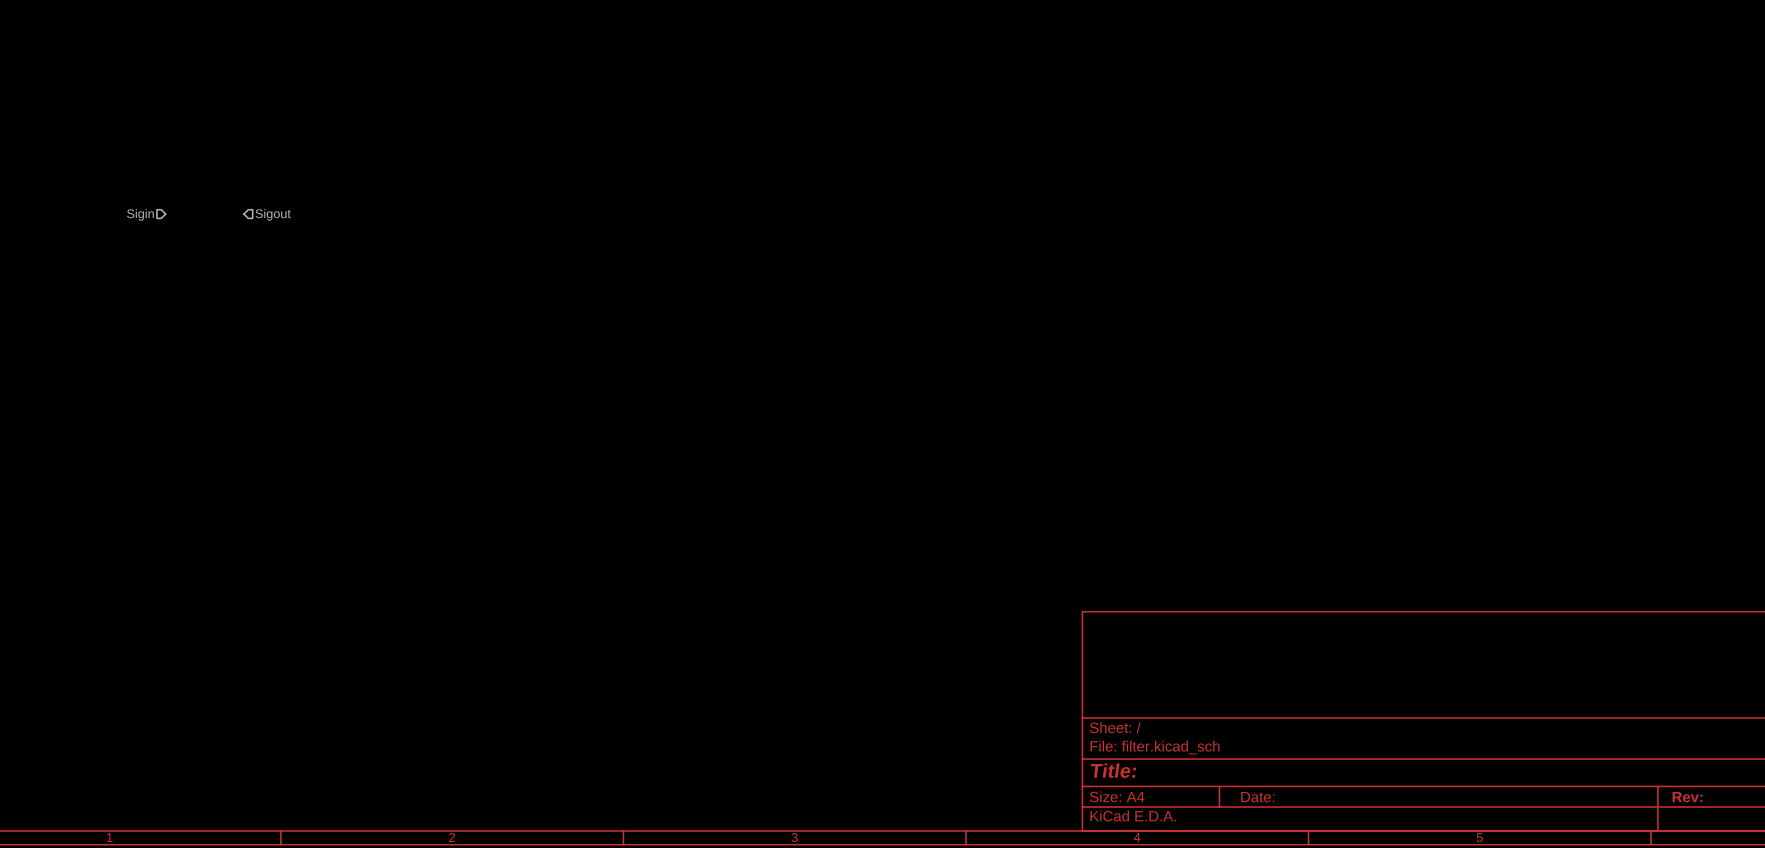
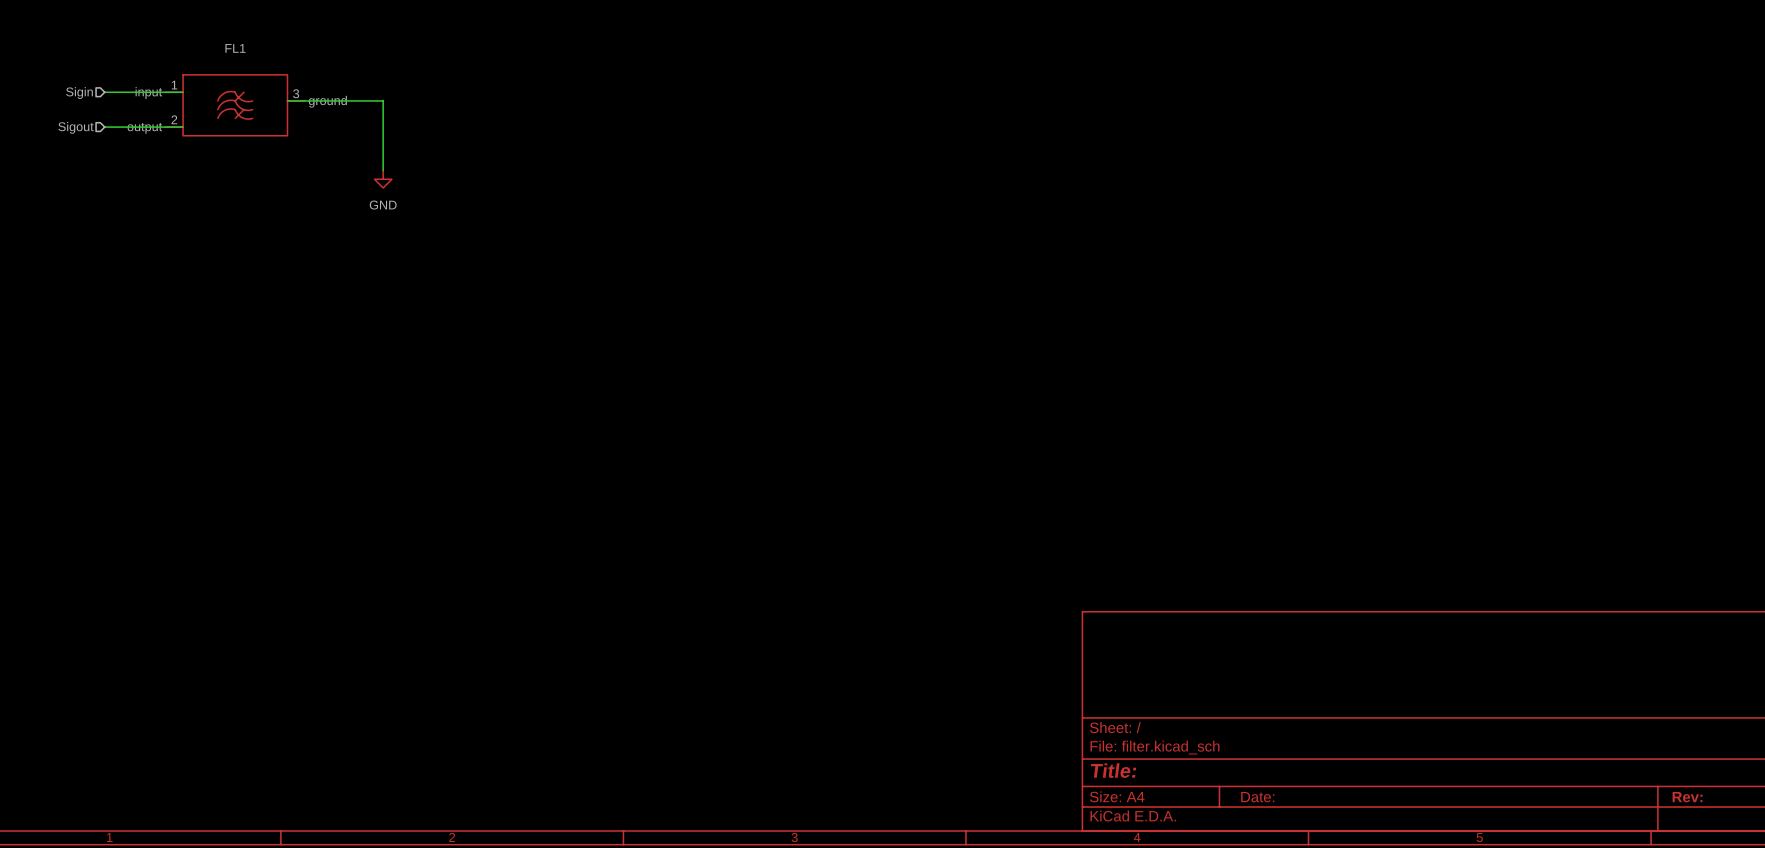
wire: none -> (104, 92) (183, 92)
wire: none -> (287, 100) (383, 100) (383, 170)
FL1: none -> (235, 105)
hierarchical label: none -> Sigout (76, 127)
wire: none -> (104, 127) (183, 127)
power symbol: none -> GND (383, 179)
hierarchical label position: Sigin (140, 214) -> Sigin (79, 93)
hierarchical label: Sigout (273, 214) -> none

